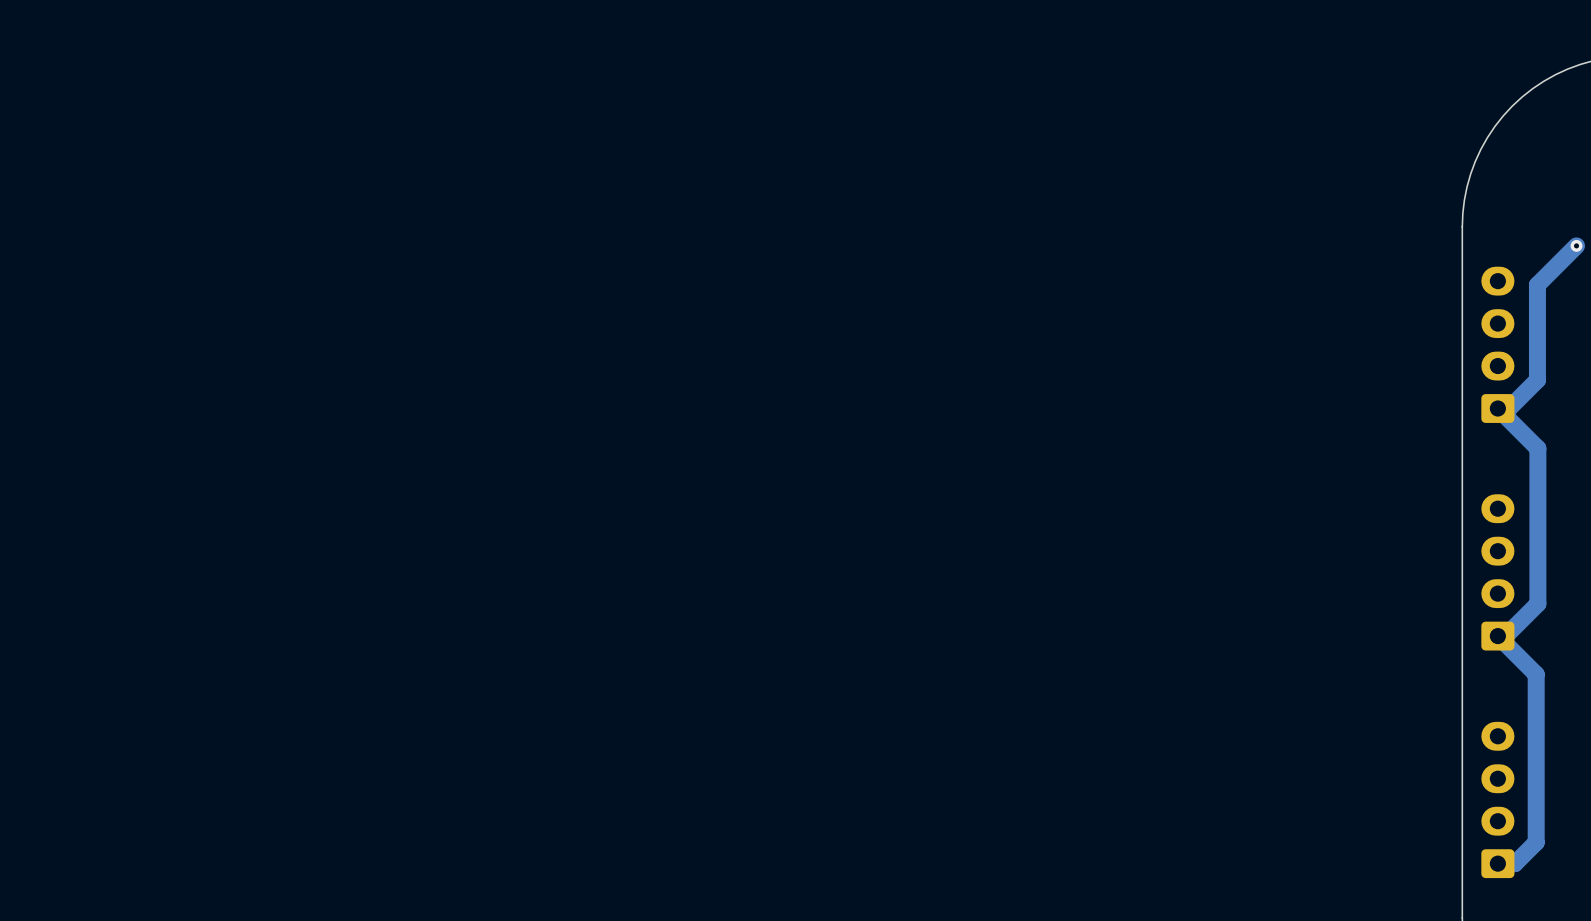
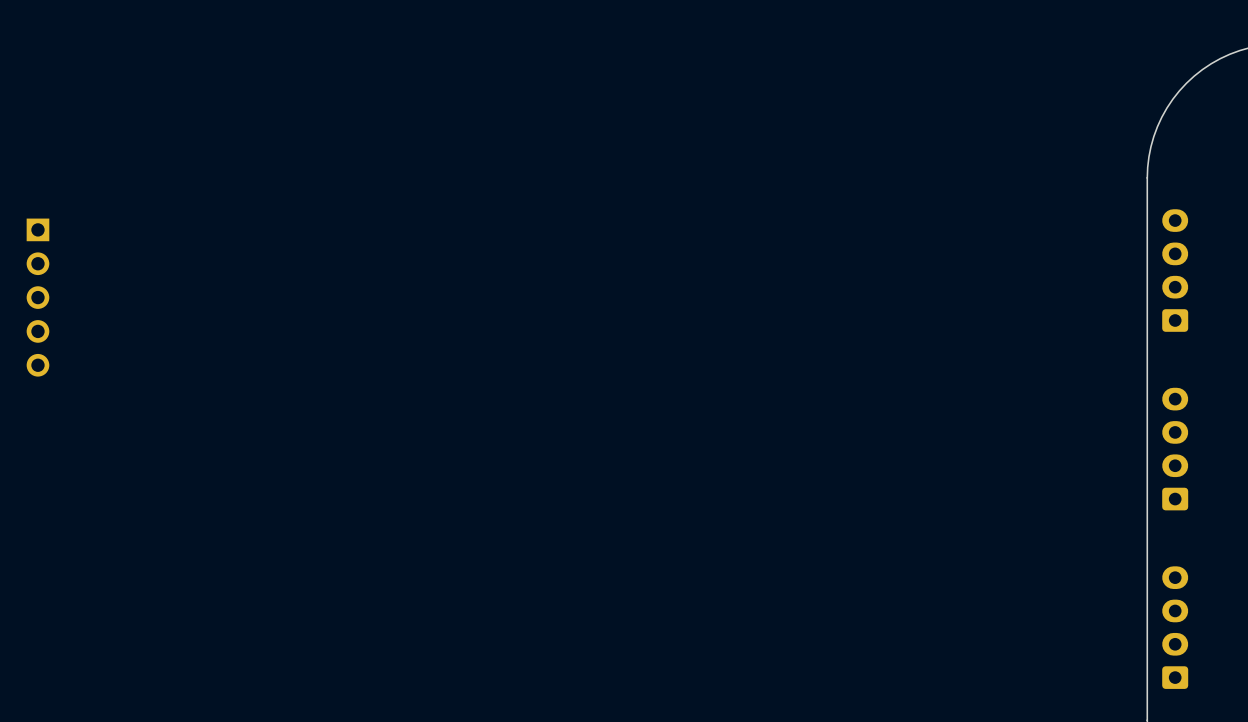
track: (1576, 245) (1537, 284) (1537, 380) (1509, 408) (1497, 408) (1537, 448) (1537, 603) (1505, 636) (1497, 636) (1536, 674) (1536, 842) (1514, 863) (1497, 863) -> none
via: (1576, 245) -> none
part: none -> (37, 297)

